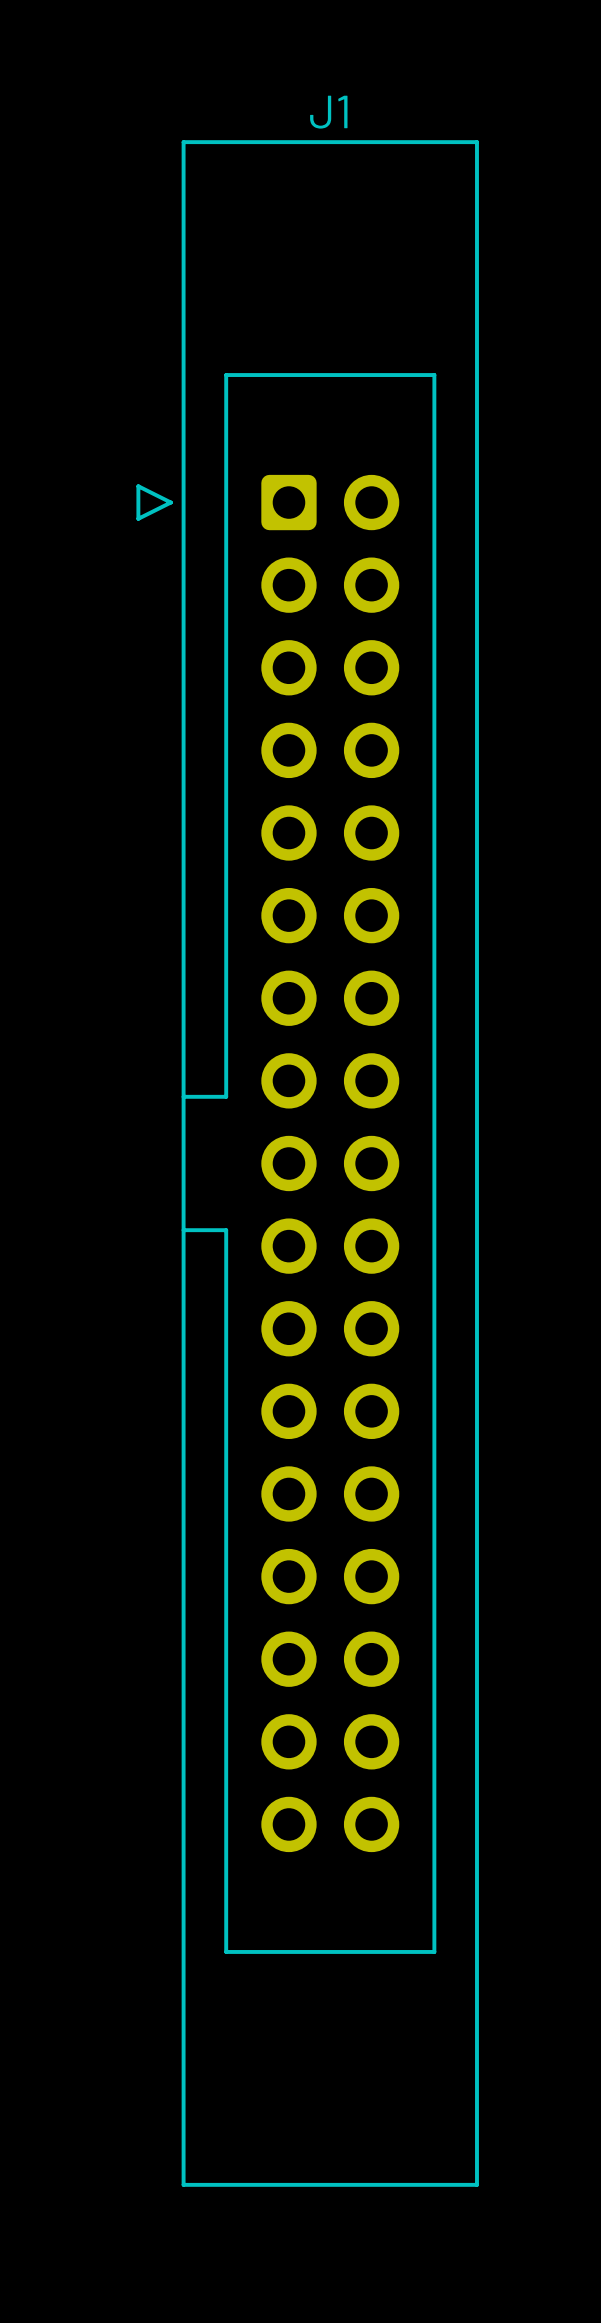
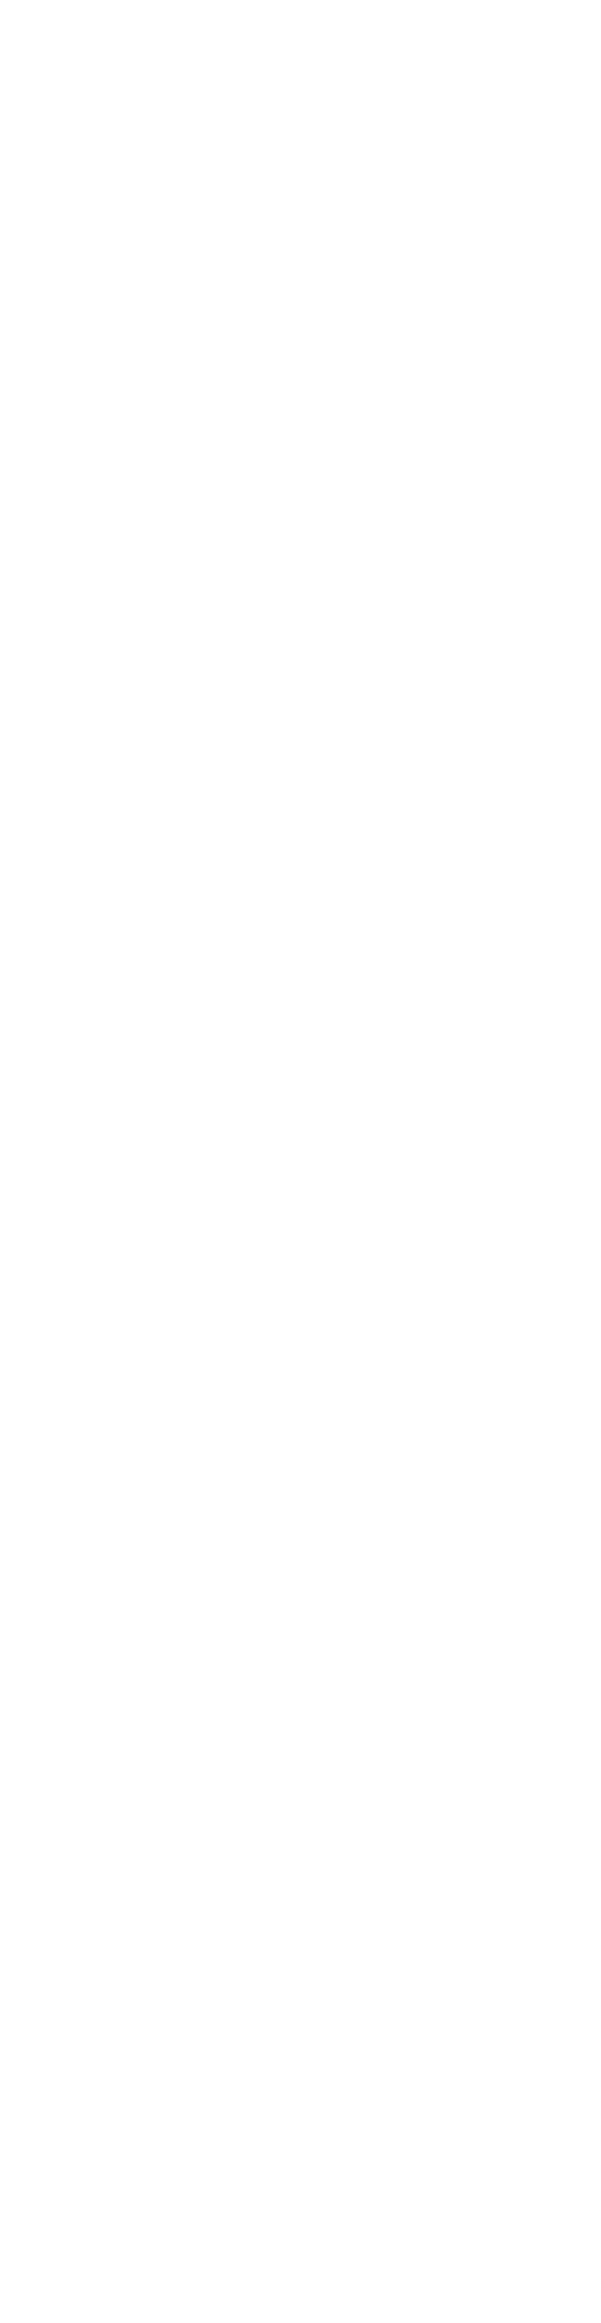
J1: (307, 1163) -> none

